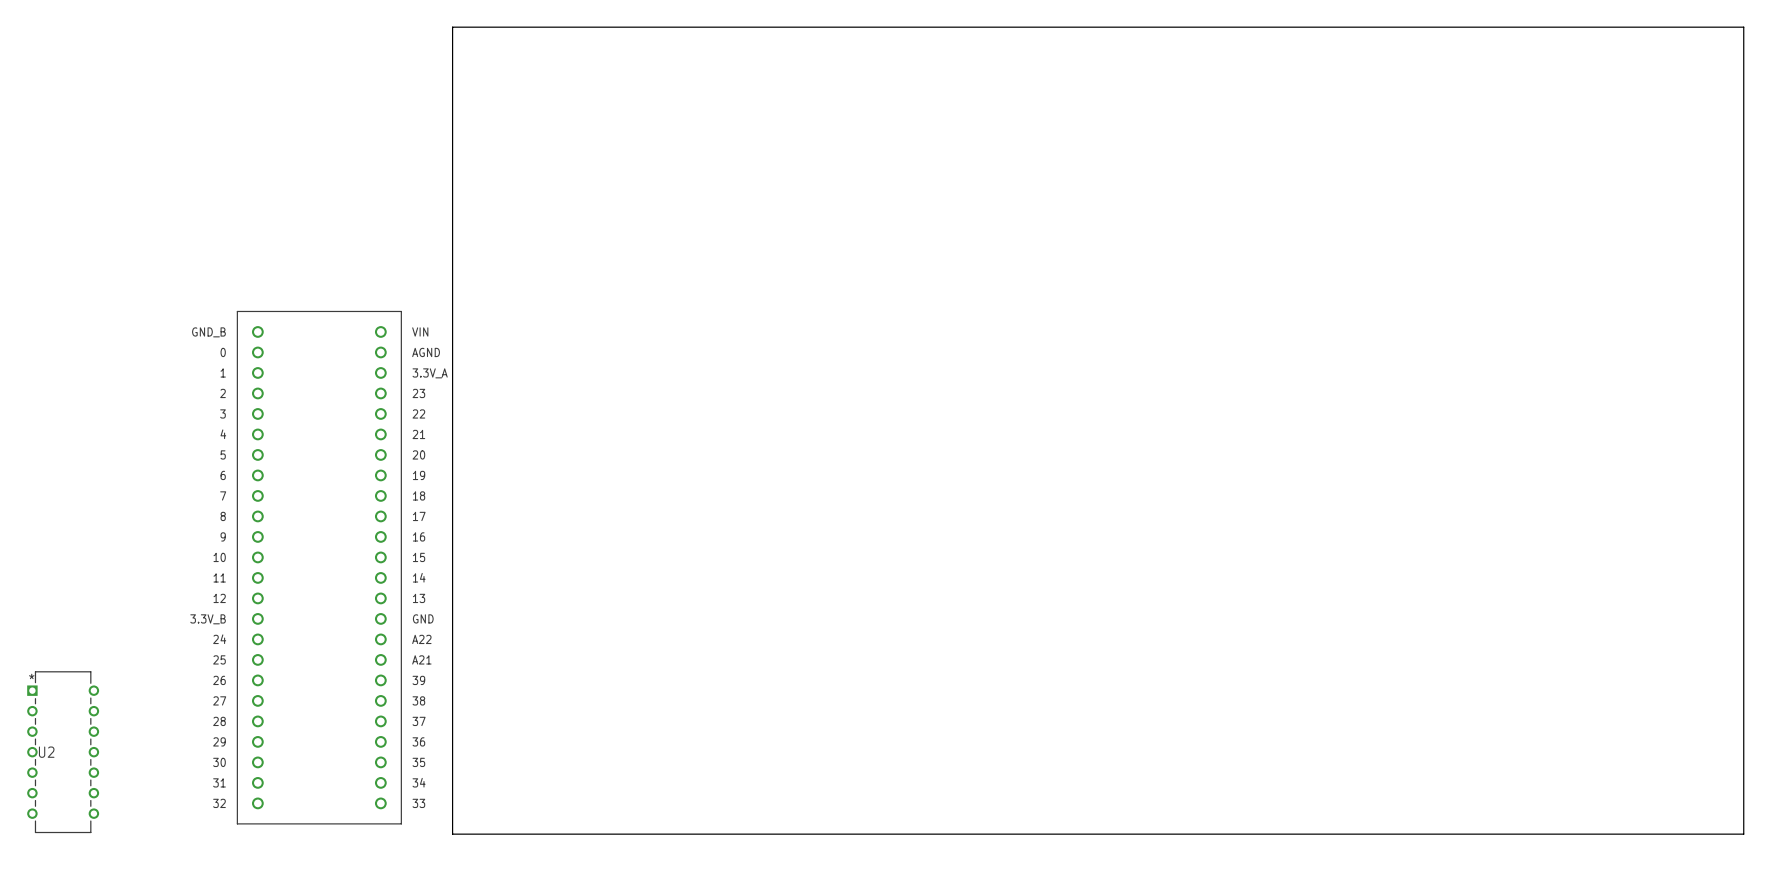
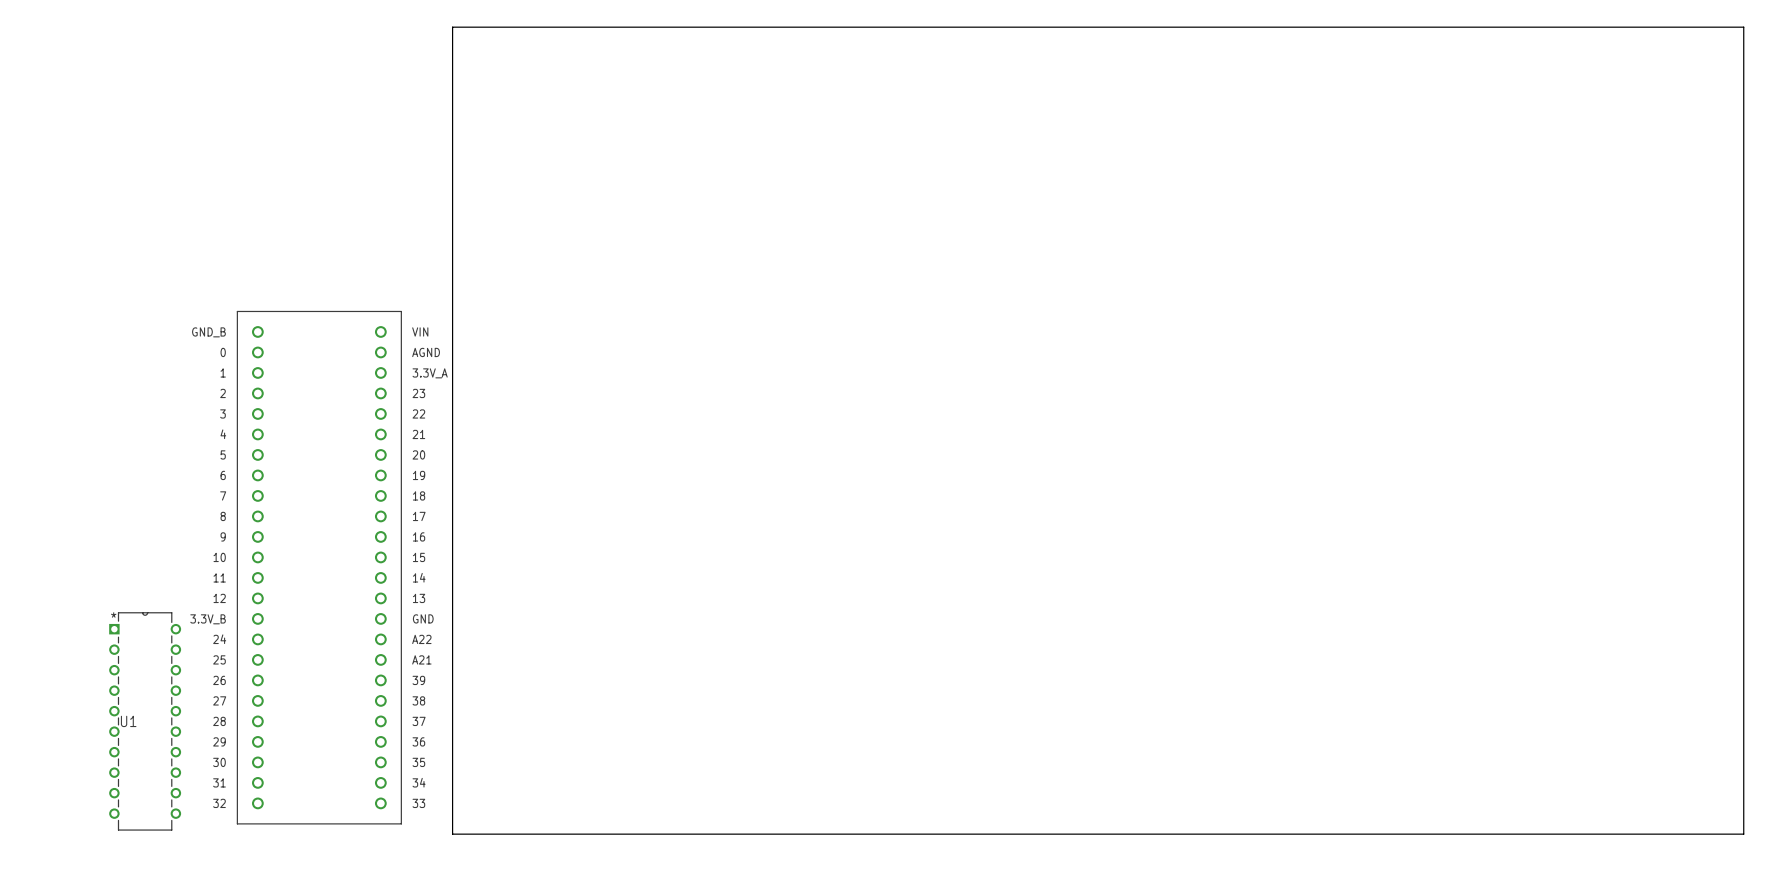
U1: none -> (145, 721)
U2: (63, 752) -> none

